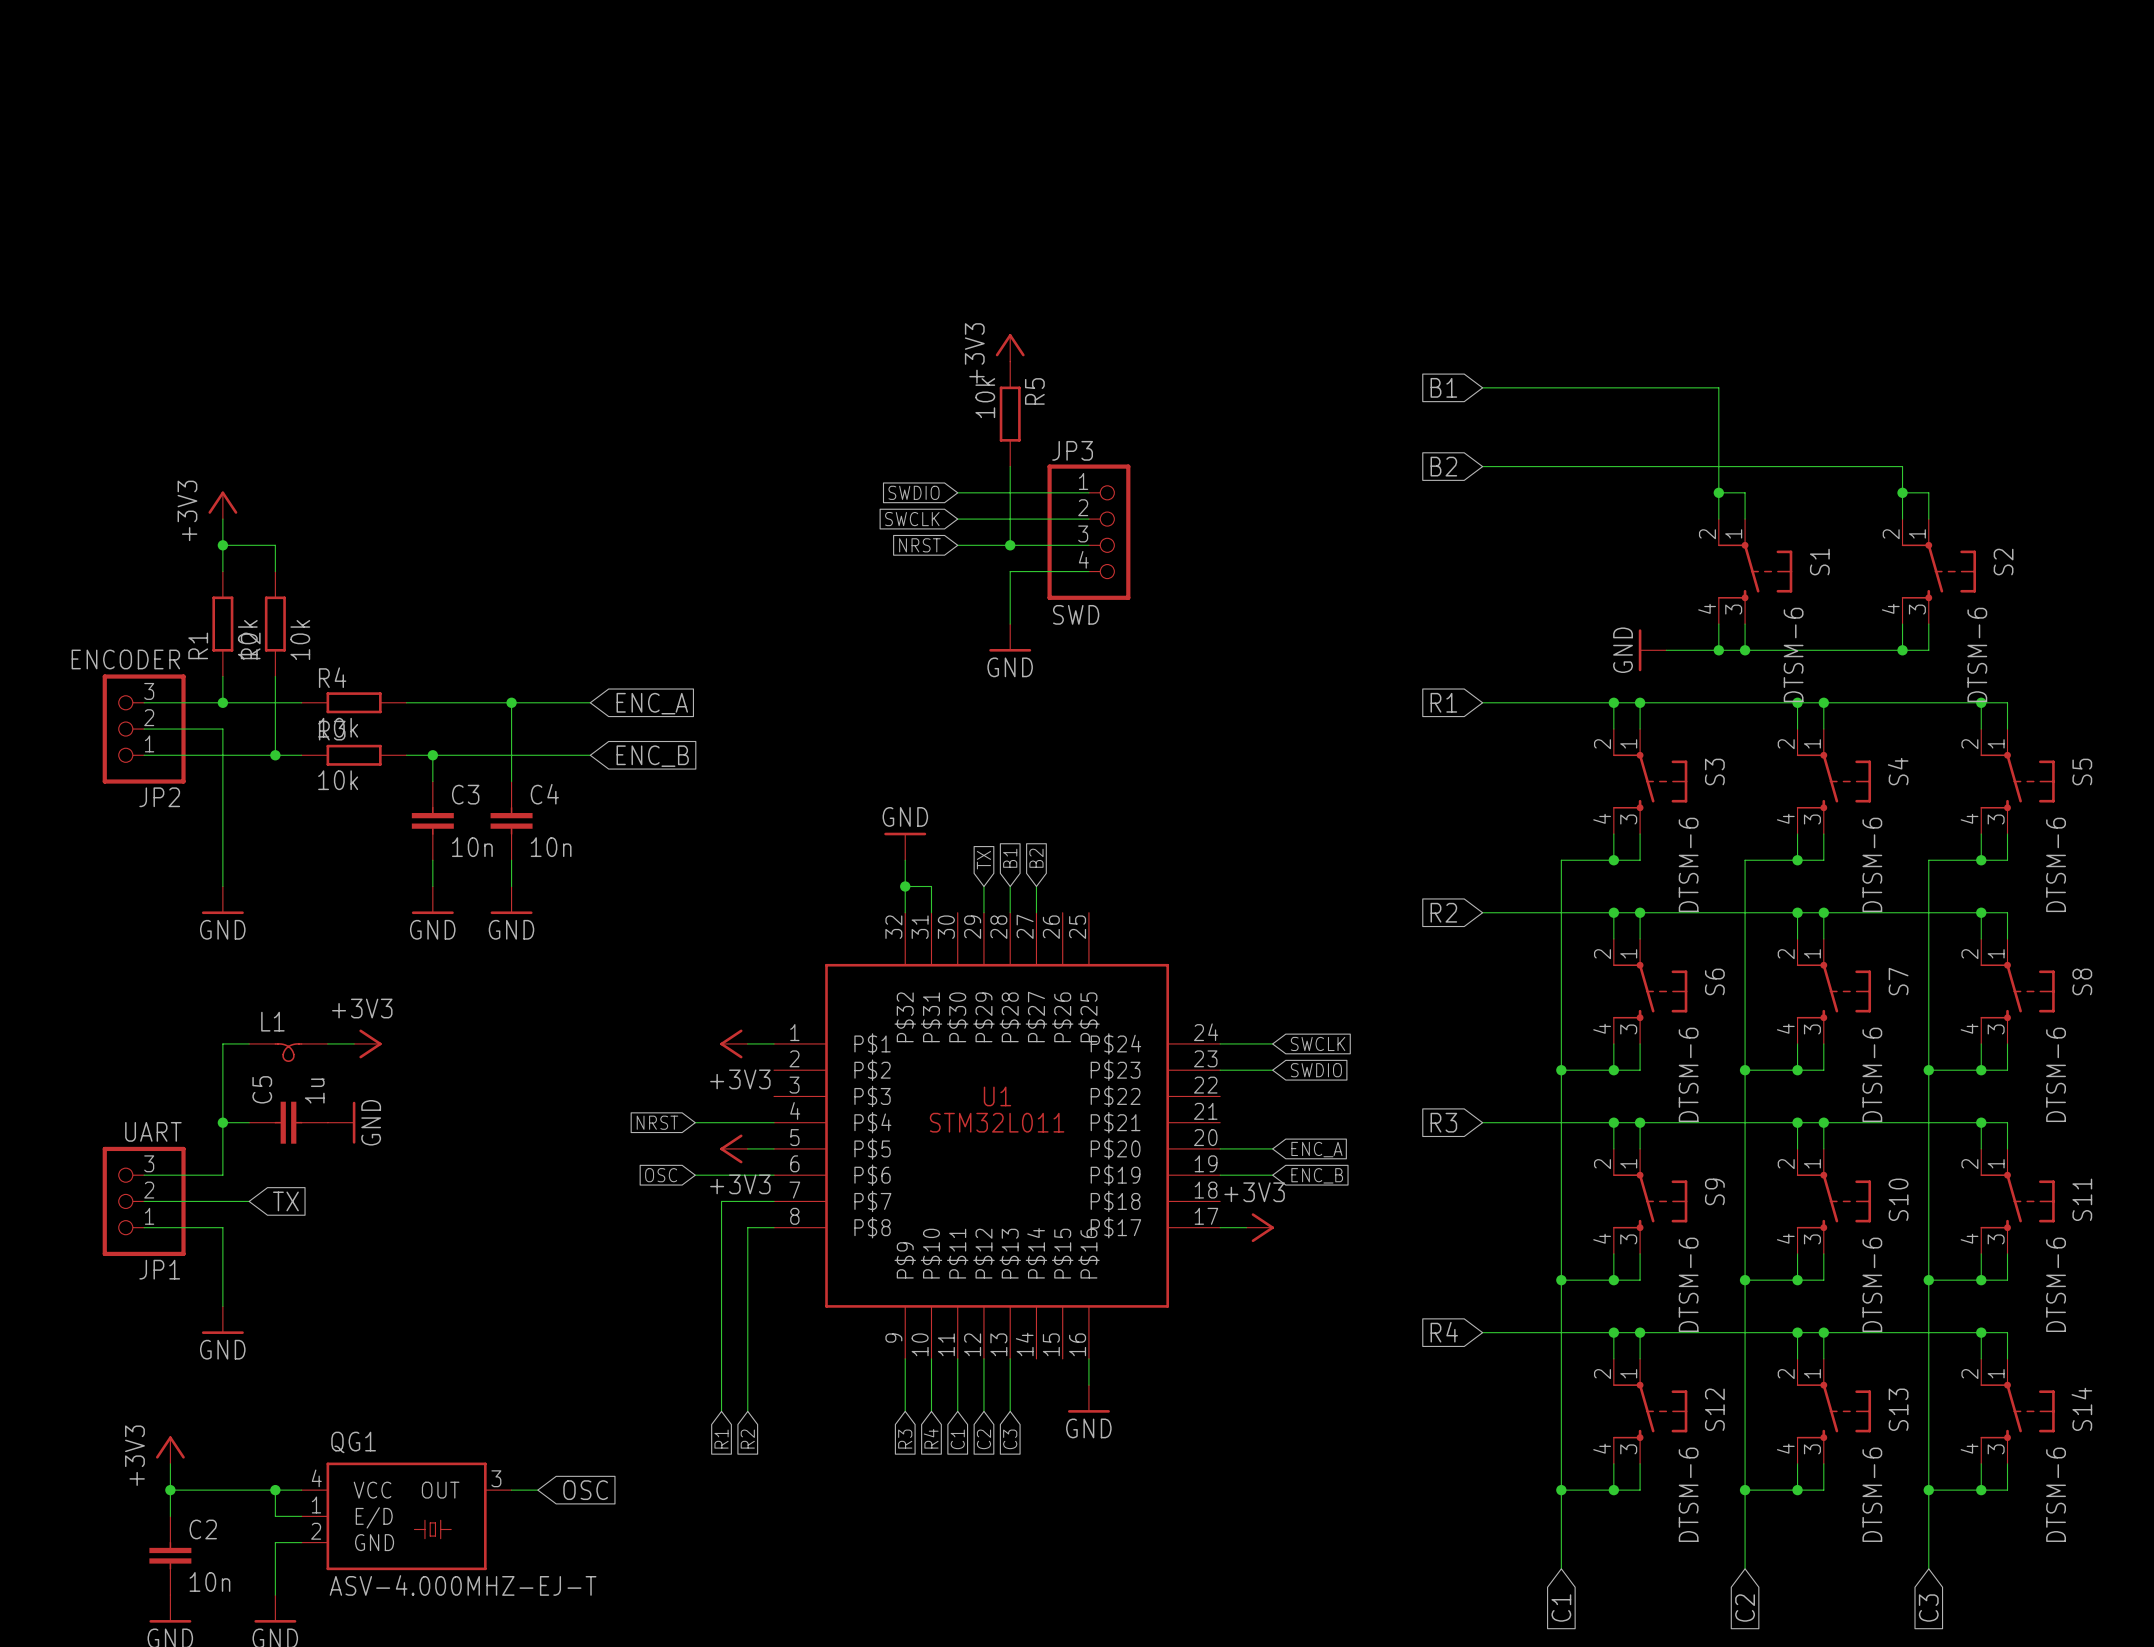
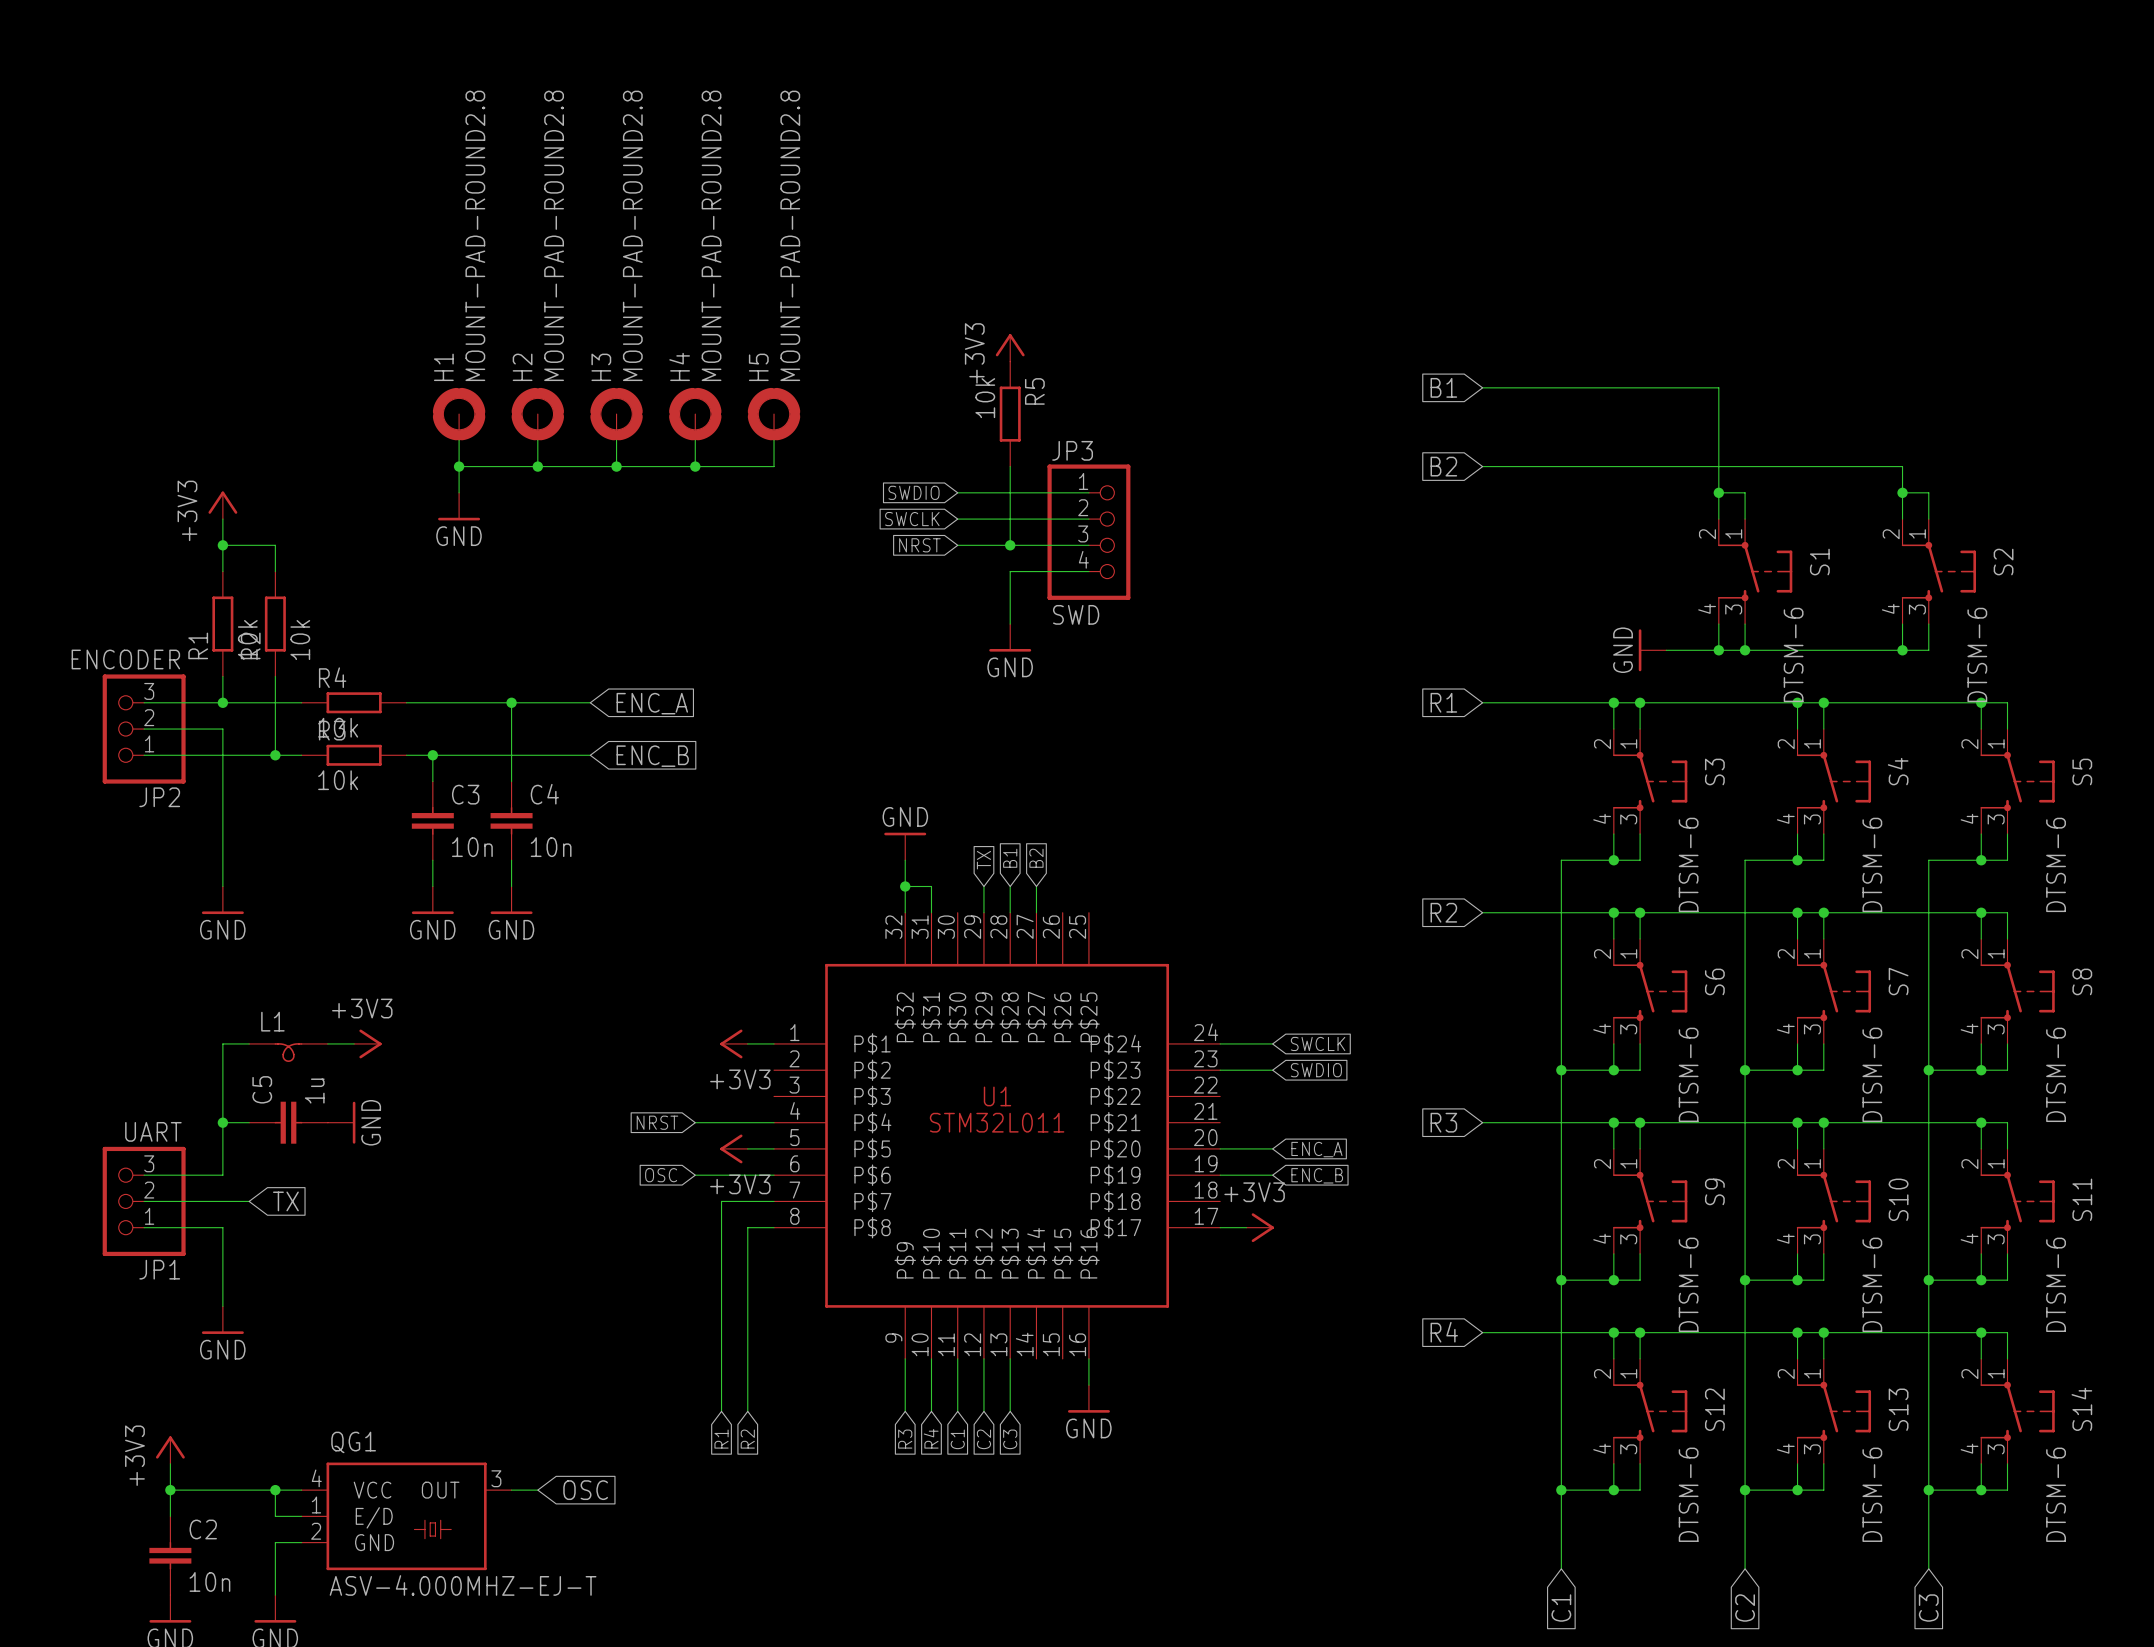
H1: none -> MOUNT-PAD-ROUND2.8 (459, 414)
H2: none -> MOUNT-PAD-ROUND2.8 (537, 414)
H3: none -> MOUNT-PAD-ROUND2.8 (616, 414)
H4: none -> MOUNT-PAD-ROUND2.8 (695, 414)
H5: none -> MOUNT-PAD-ROUND2.8 (774, 414)
wire: none -> (459, 440) (459, 492)
wire: none -> (537, 440) (537, 466)
wire: none -> (616, 440) (616, 466)
wire: none -> (695, 440) (695, 466)
wire: none -> (774, 440) (774, 466) (459, 466)
junction: none -> (459, 466)
junction: none -> (537, 466)
junction: none -> (616, 466)
junction: none -> (695, 466)
power symbol: none -> GND (459, 506)

